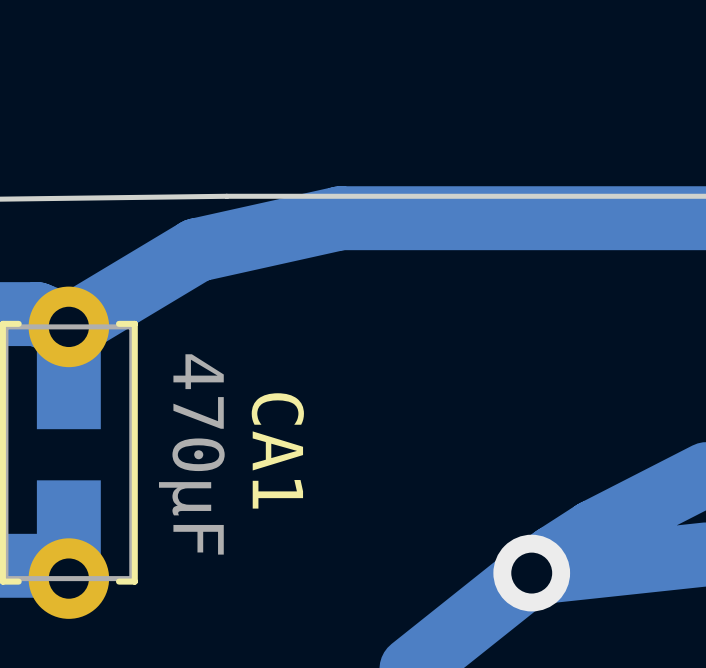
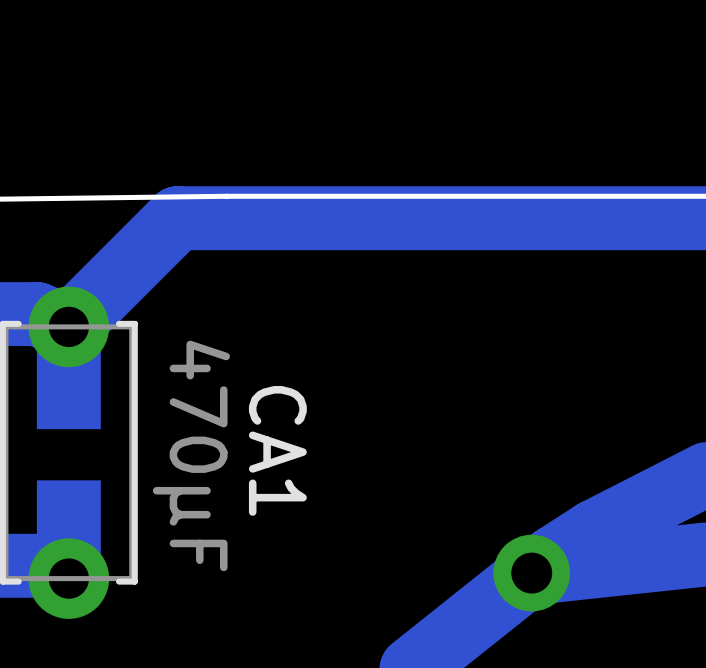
track: (340, 218) (196, 250) (68, 326) -> (340, 218) (177, 218) (68, 326)

